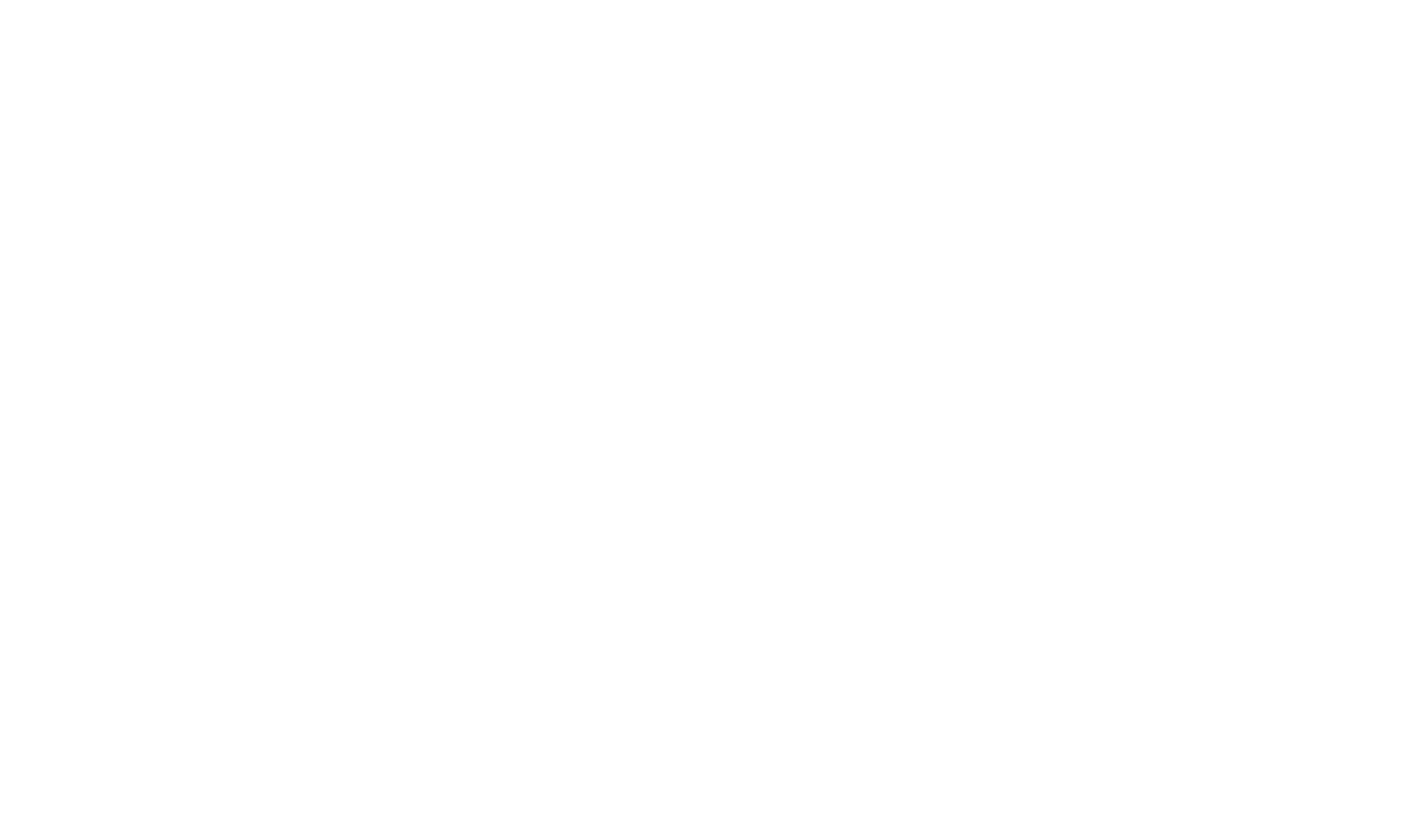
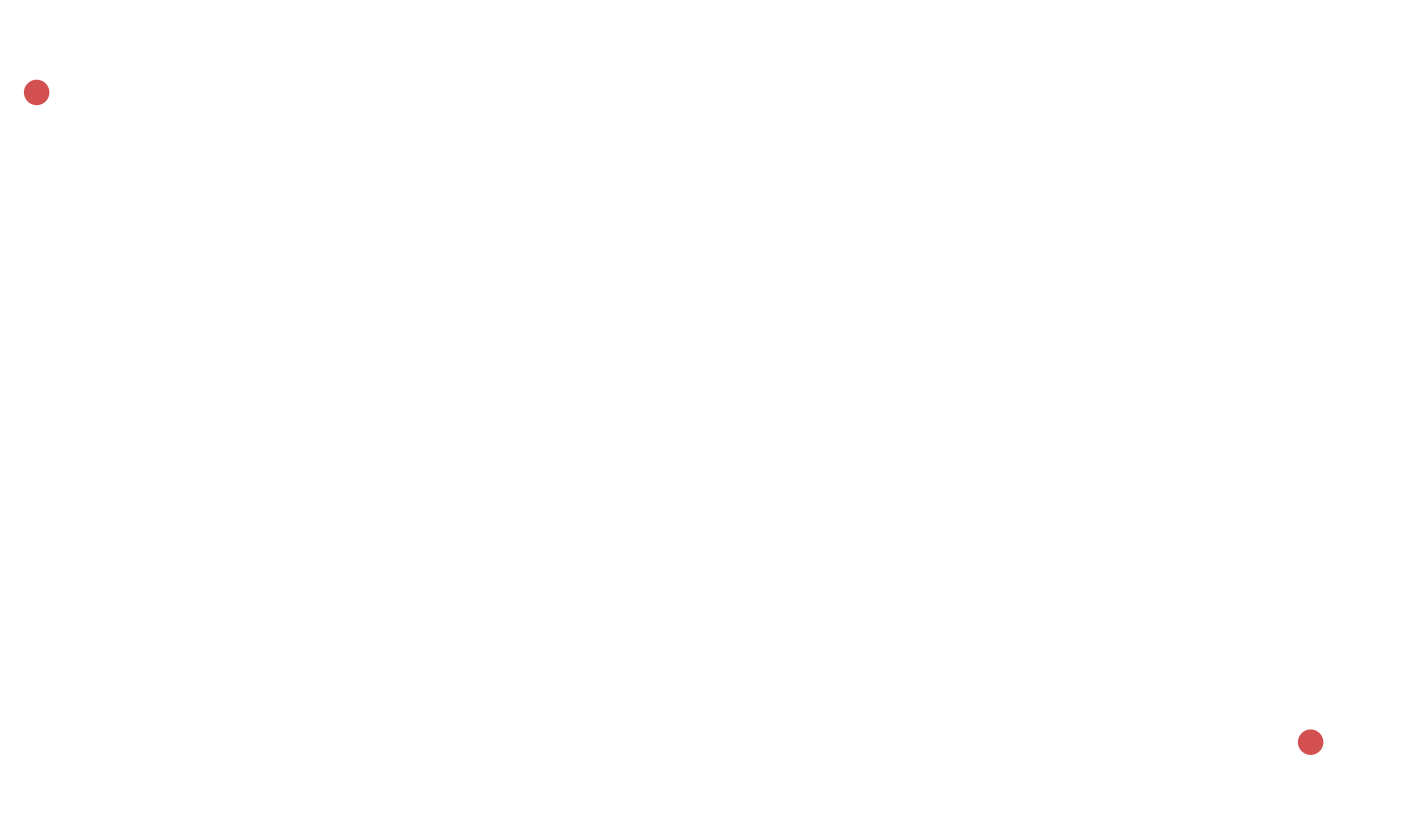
part: none -> (36, 92)
part: none -> (1310, 742)

